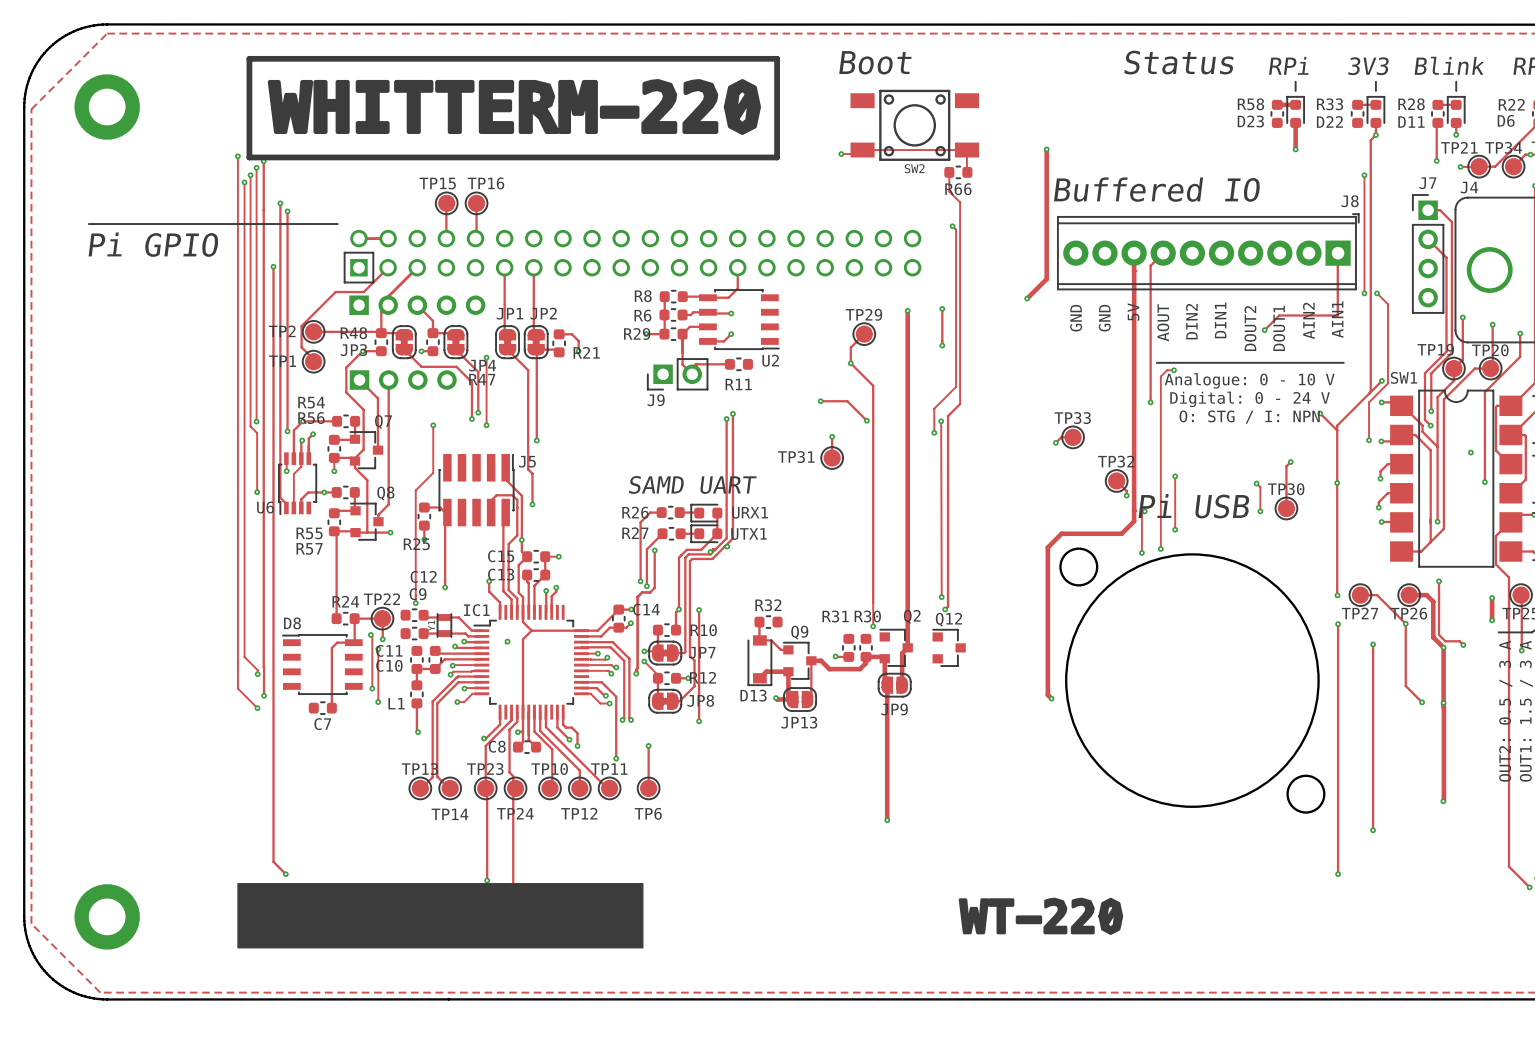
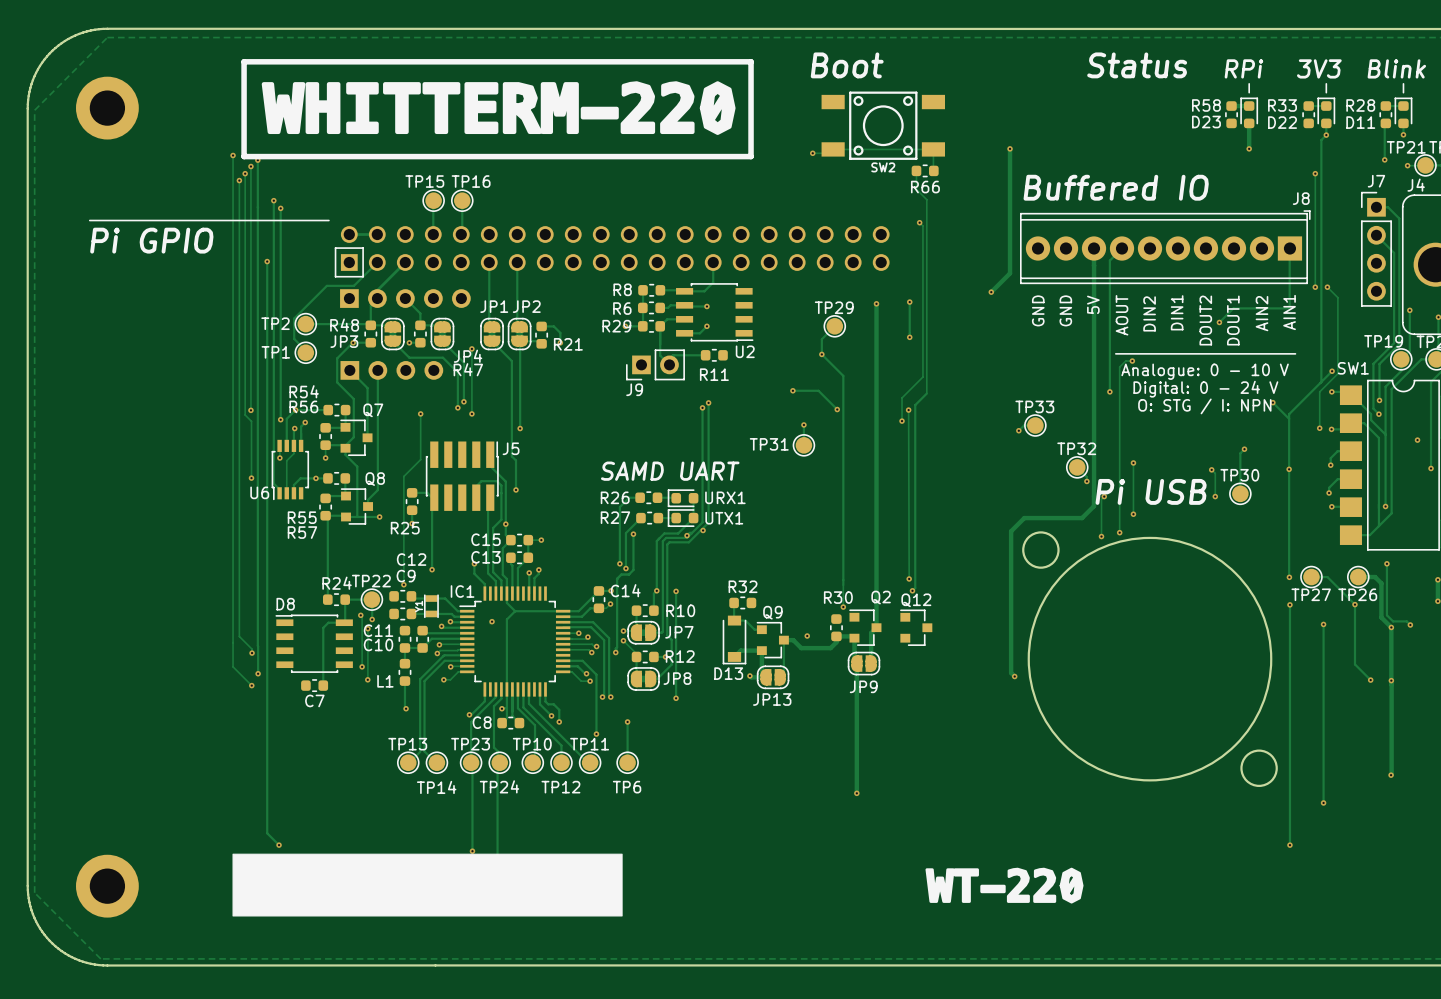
R31: (848, 647) -> none
track: (836, 656) (848, 656) -> none

